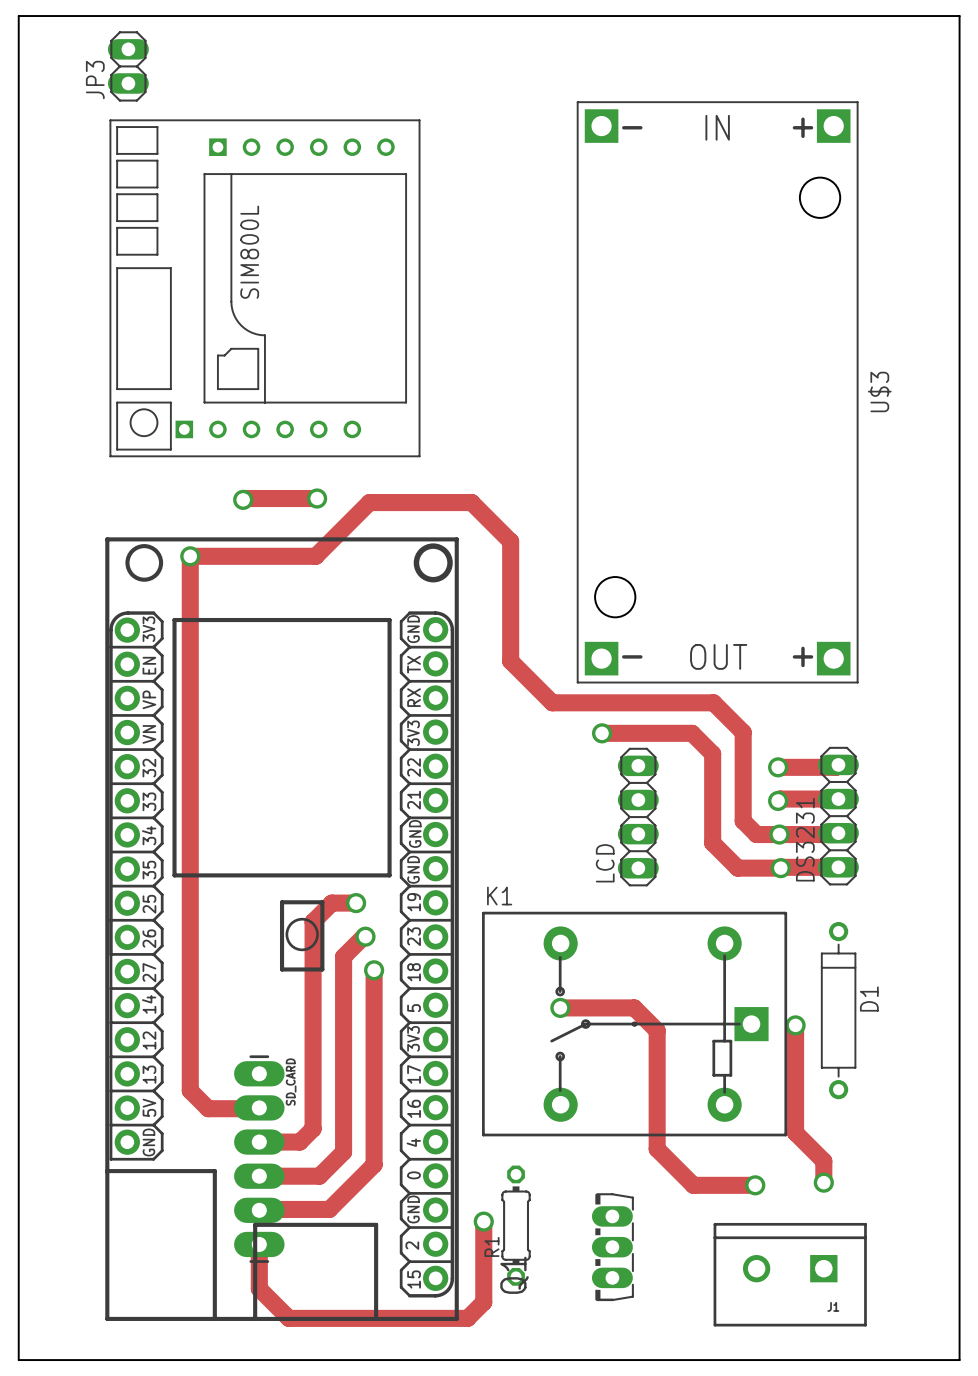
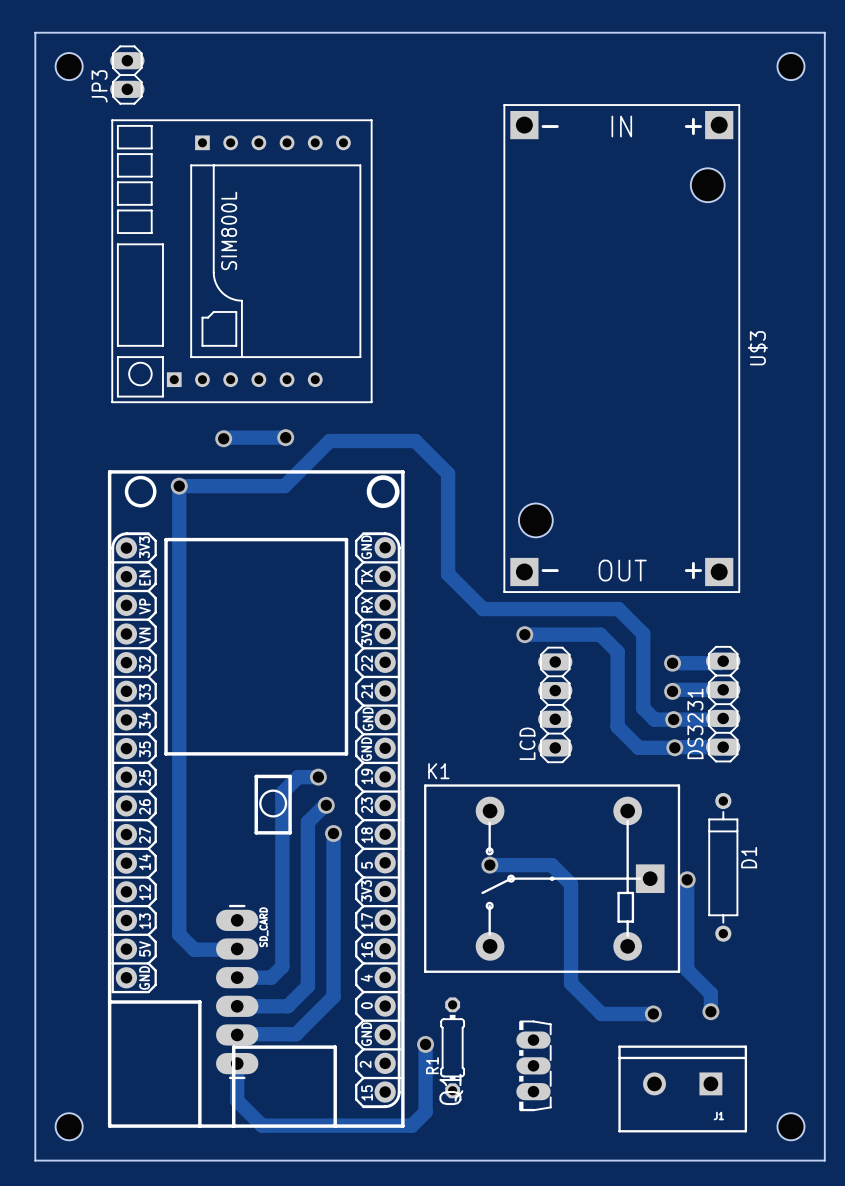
hole: none -> (69, 66)
hole: none -> (790, 66)
hole: none -> (69, 1126)
hole: none -> (790, 1126)

